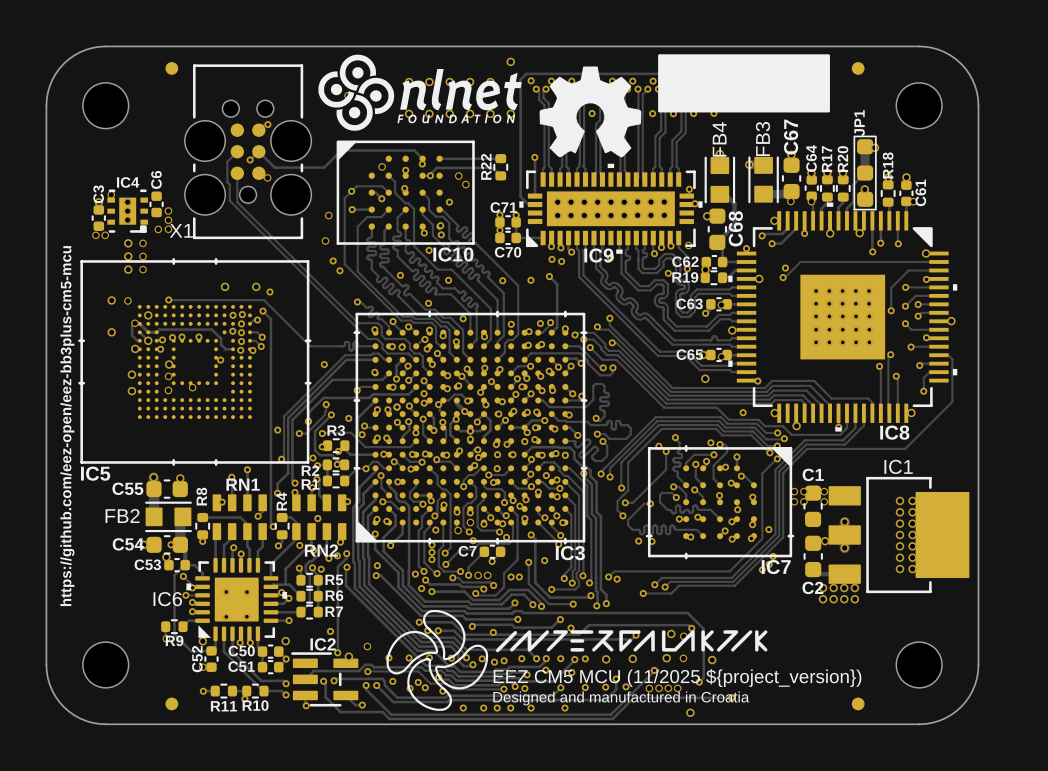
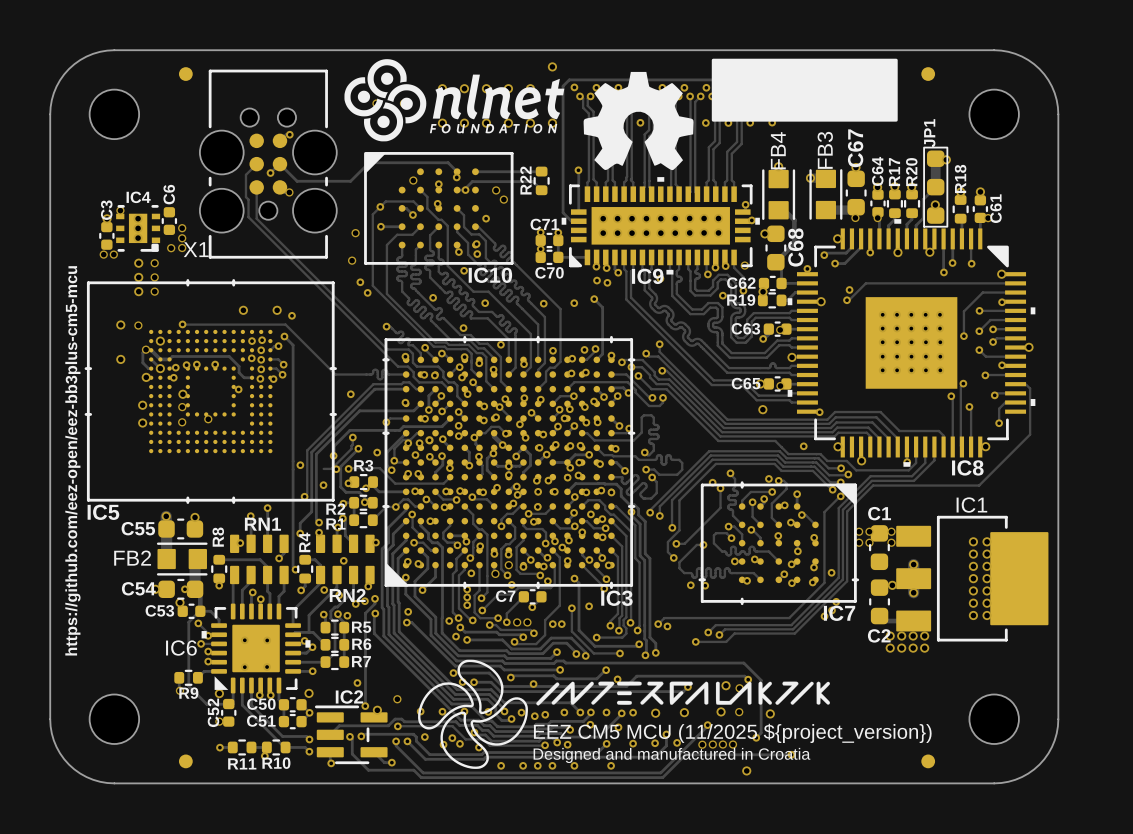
track: none -> (420, 433) (417, 433) (410, 439) (403, 439) (394, 448) (394, 461)
track: (423, 419) (423, 434) (429, 441) -> none
via position: (423, 419) -> (415, 455)
via: (299, 433) -> none
via: none -> (336, 469)
via: none -> (323, 485)
via: (313, 458) -> none

